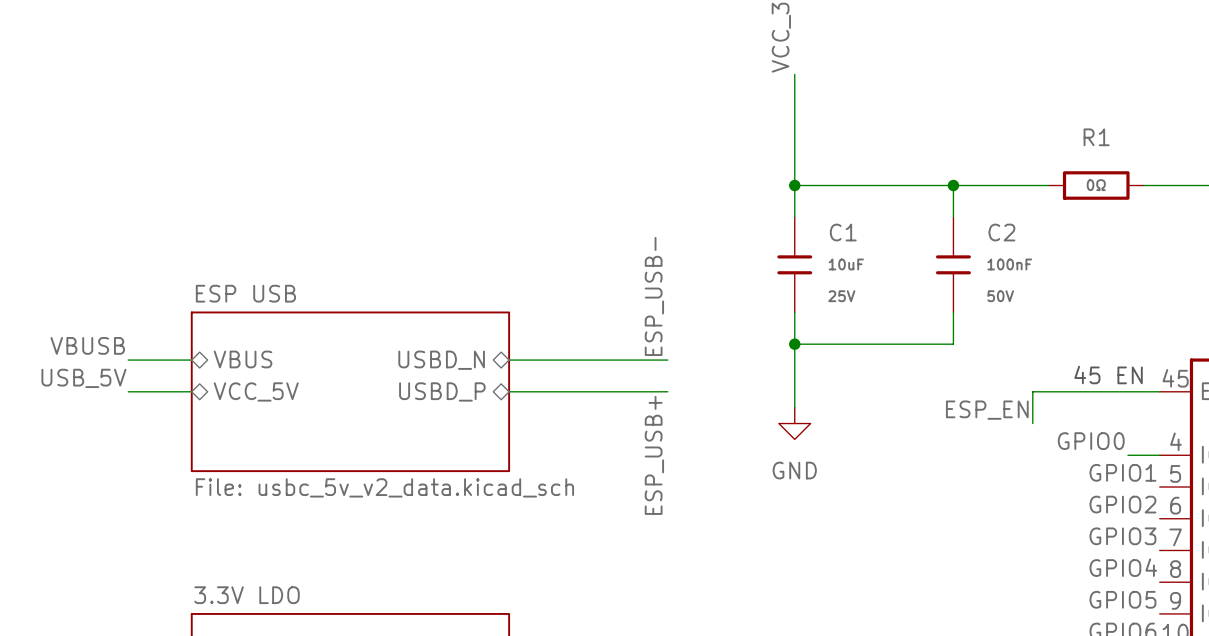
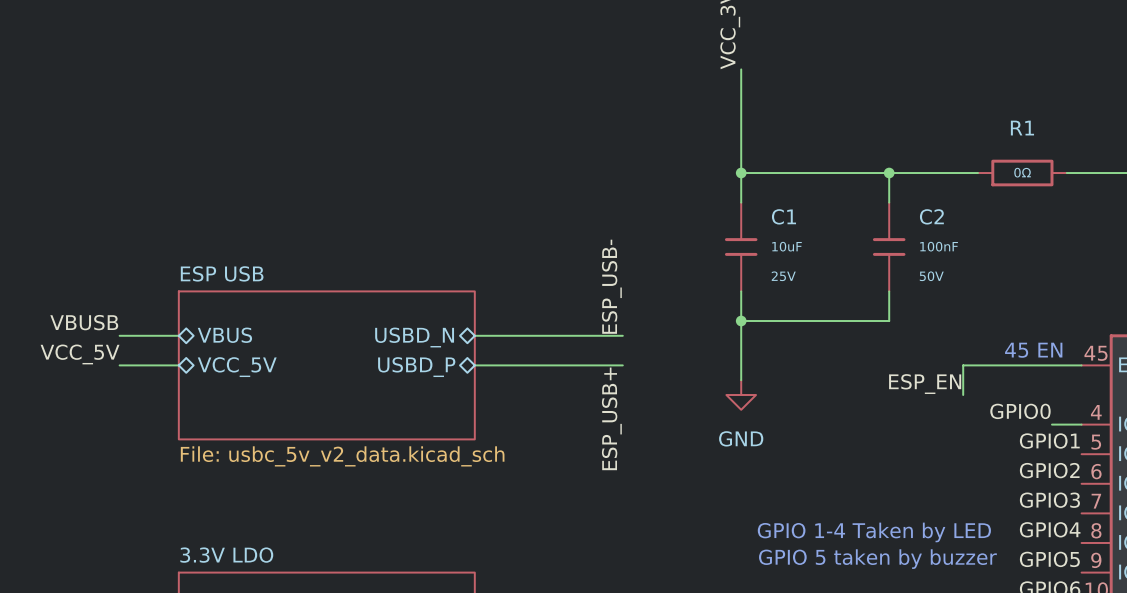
label: USB_5V (83, 378) -> VCC_5V (80, 354)
text: none -> GPIO 1-4 Taken by LED (874, 532)
text: none -> GPIO 5 taken by buzzer (877, 559)

